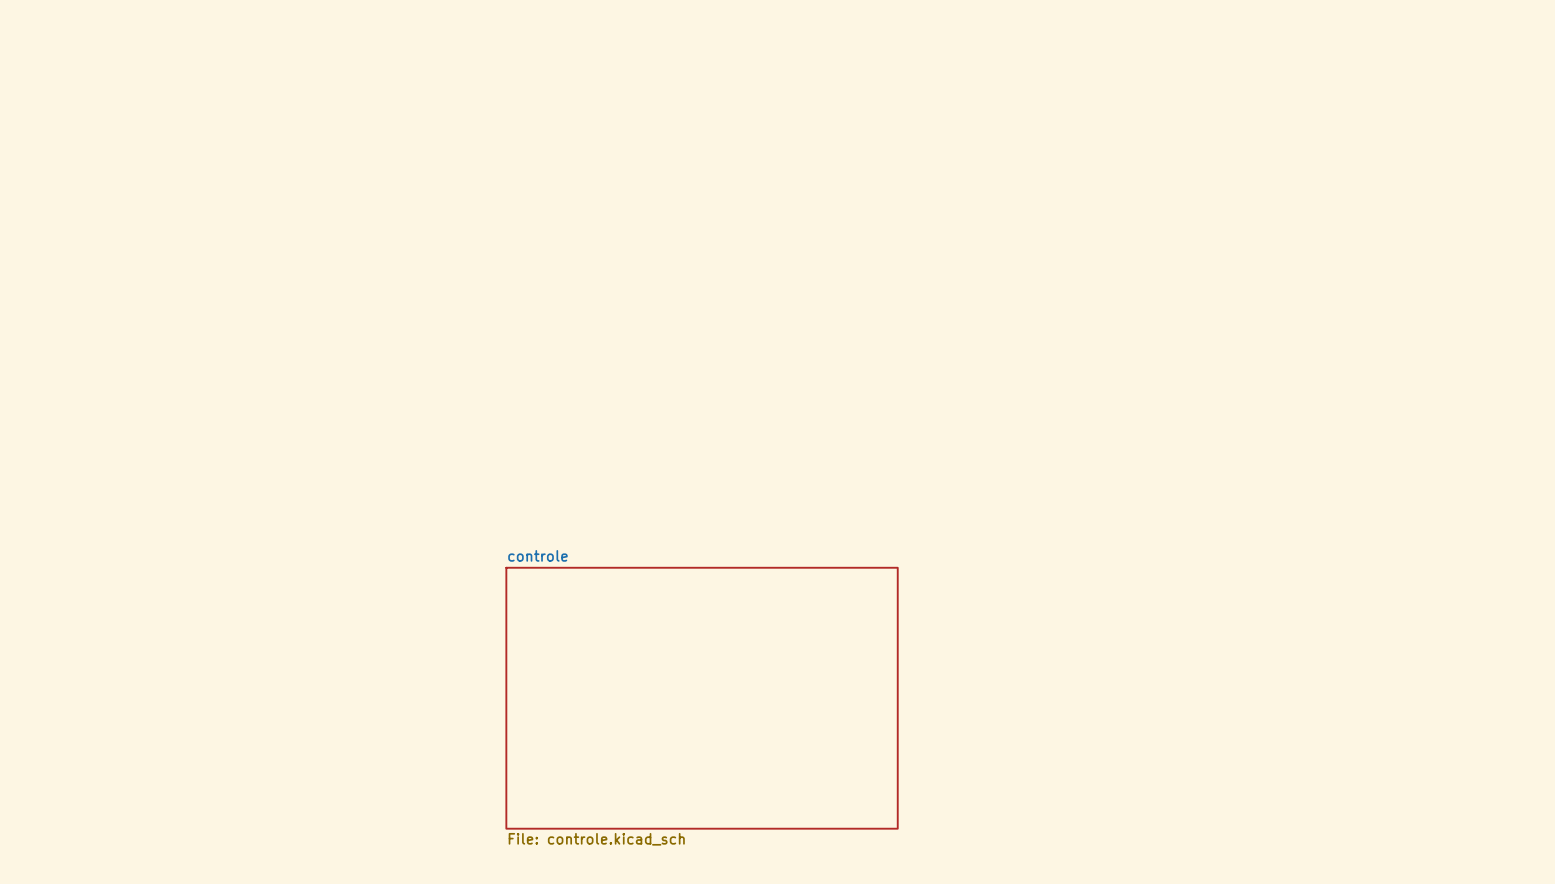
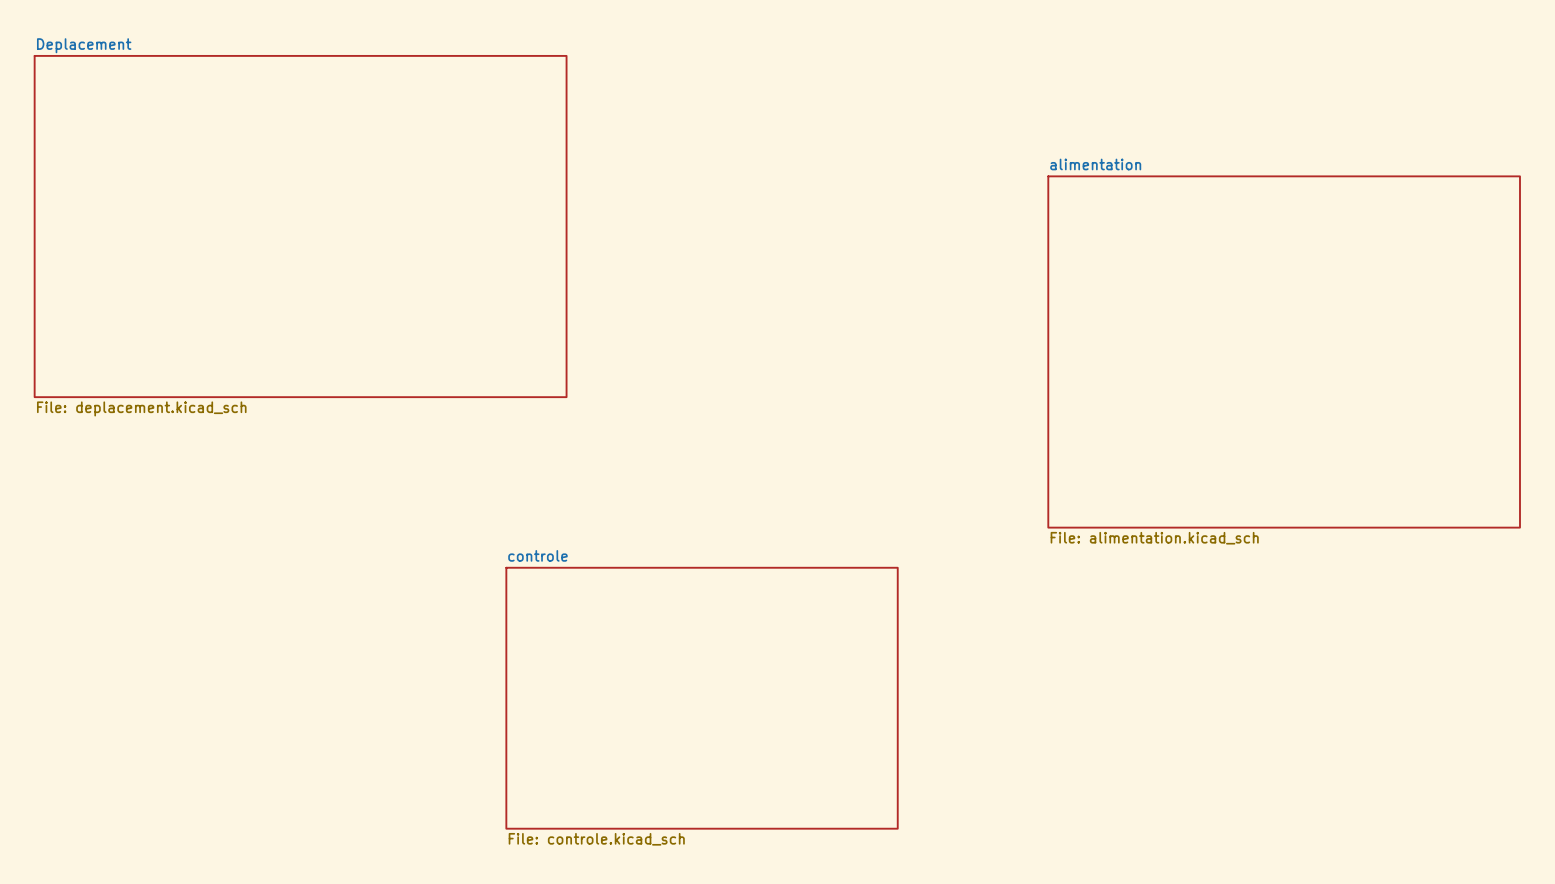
sheet Deplacement: none -> File: deplacement.kicad_sch (300, 226)
sheet alimentation: none -> File: alimentation.kicad_sch (1284, 351)

